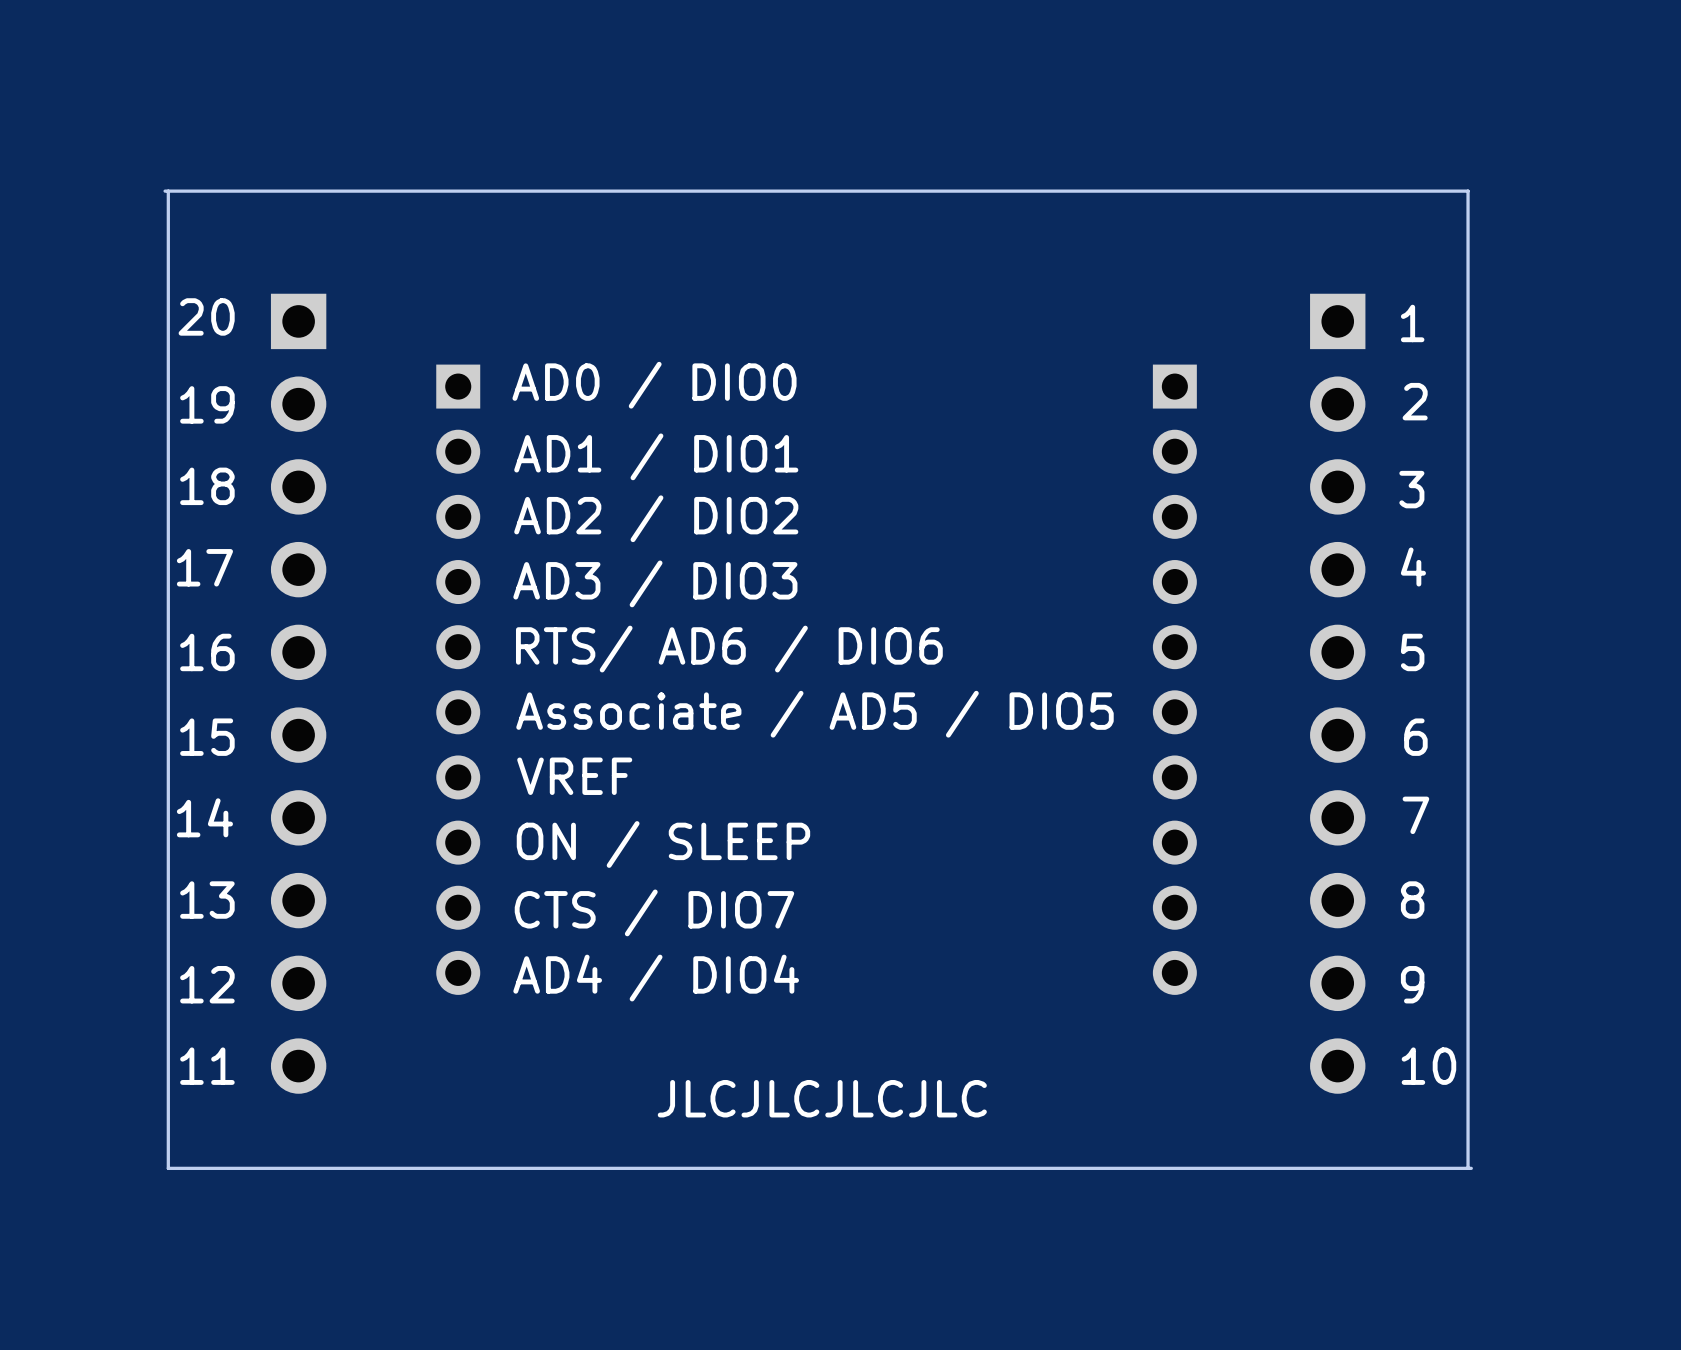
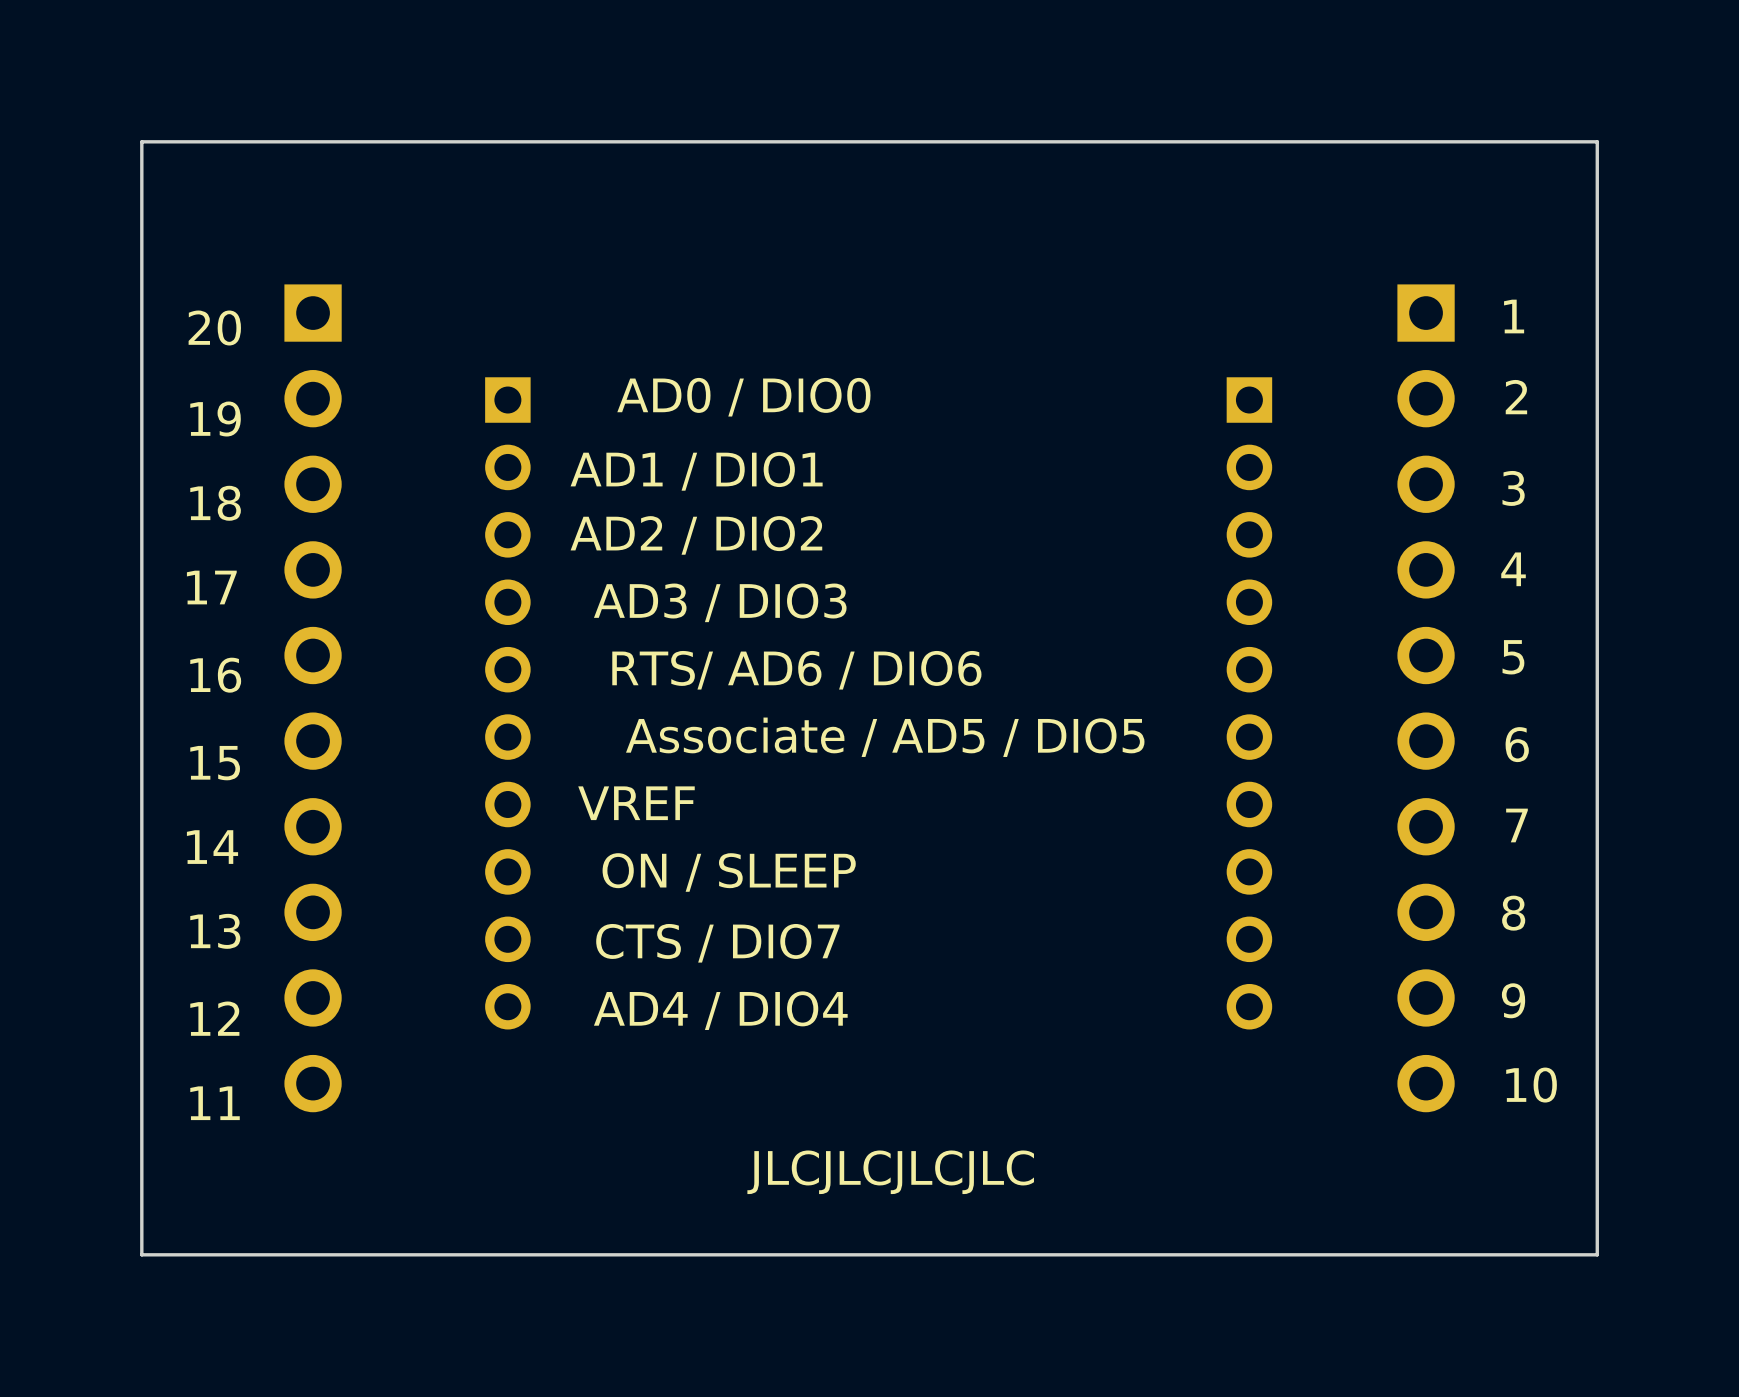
board edge: none -> (1597, 141) (141, 141) (141, 1254) (1597, 1254) (1597, 141)
board edge: (165, 191) (1468, 191) (1468, 1168) -> none
board edge: (168, 191) (168, 1168) (1471, 1168) -> none
text position: 1 (1412, 323) -> 1 (1514, 316)
text position: AD0 / DIO0 (654, 385) -> AD0 / DIO0 (743, 397)
text position: 2 (1415, 401) -> 2 (1516, 397)
text position: AD1 / DIO1 (656, 456) -> AD1 / DIO1 (696, 471)
text position: 3 (1411, 489) -> 3 (1513, 488)
text position: AD2 / DIO2 (656, 518) -> AD2 / DIO2 (696, 535)
text position: 4 (1413, 567) -> 4 (1513, 569)
text position: AD3 / DIO3 (655, 583) -> AD3 / DIO3 (720, 602)
text position: RTS/ AD6 / DIO6 (729, 649) -> RTS/ AD6 / DIO6 (796, 670)
text position: 5 (1412, 652) -> 5 (1513, 657)
part position: (458, 679) -> (507, 703)
part position: (1174, 679) -> (1249, 703)
part position: (298, 693) -> (313, 698)
part position: (1337, 693) -> (1426, 698)
text position: Associate / AD5 / DIO5 (815, 714) -> Associate / AD5 / DIO5 (885, 737)
text position: 6 (1415, 737) -> 6 (1517, 744)
text position: VREF (574, 776) -> VREF (636, 803)
text position: 7 (1415, 815) -> 7 (1516, 825)
text position: ON / SLEEP (663, 844) -> ON / SLEEP (729, 872)
text position: 8 (1412, 900) -> 8 (1513, 913)
text position: CTS / DIO7 (654, 912) -> CTS / DIO7 (717, 943)
text position: AD4 / DIO4 (656, 978) -> AD4 / DIO4 (720, 1010)
text position: 9 (1412, 984) -> 9 (1513, 1000)
text position: 10 (1428, 1066) -> 10 (1531, 1085)
text position: JLCJLCJLCJLC (822, 1098) -> JLCJLCJLCJLC (890, 1172)

